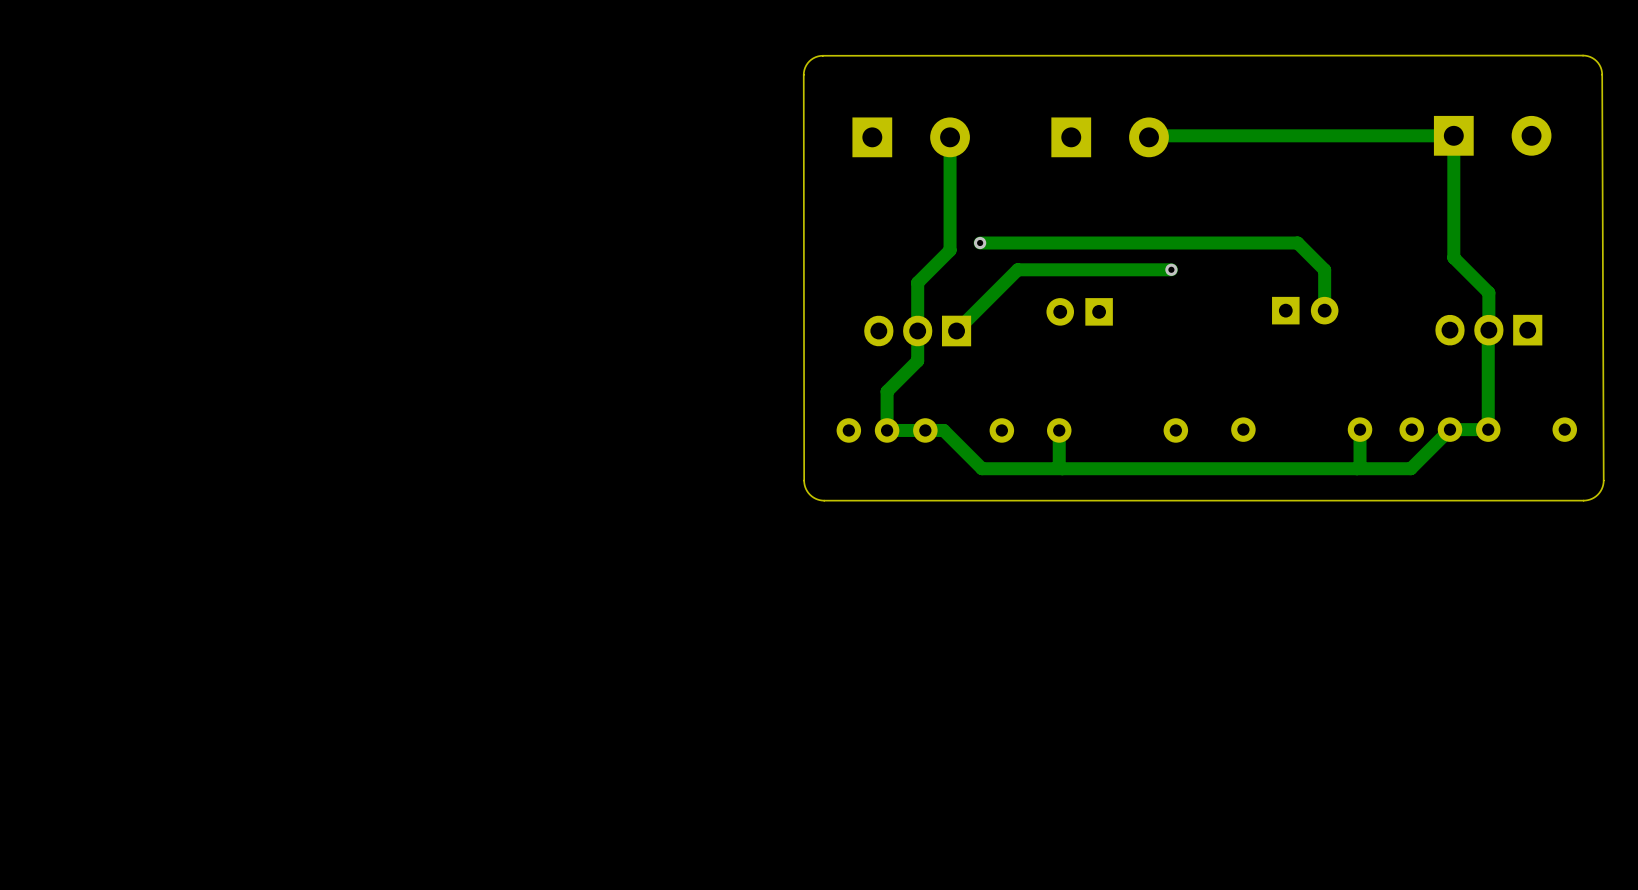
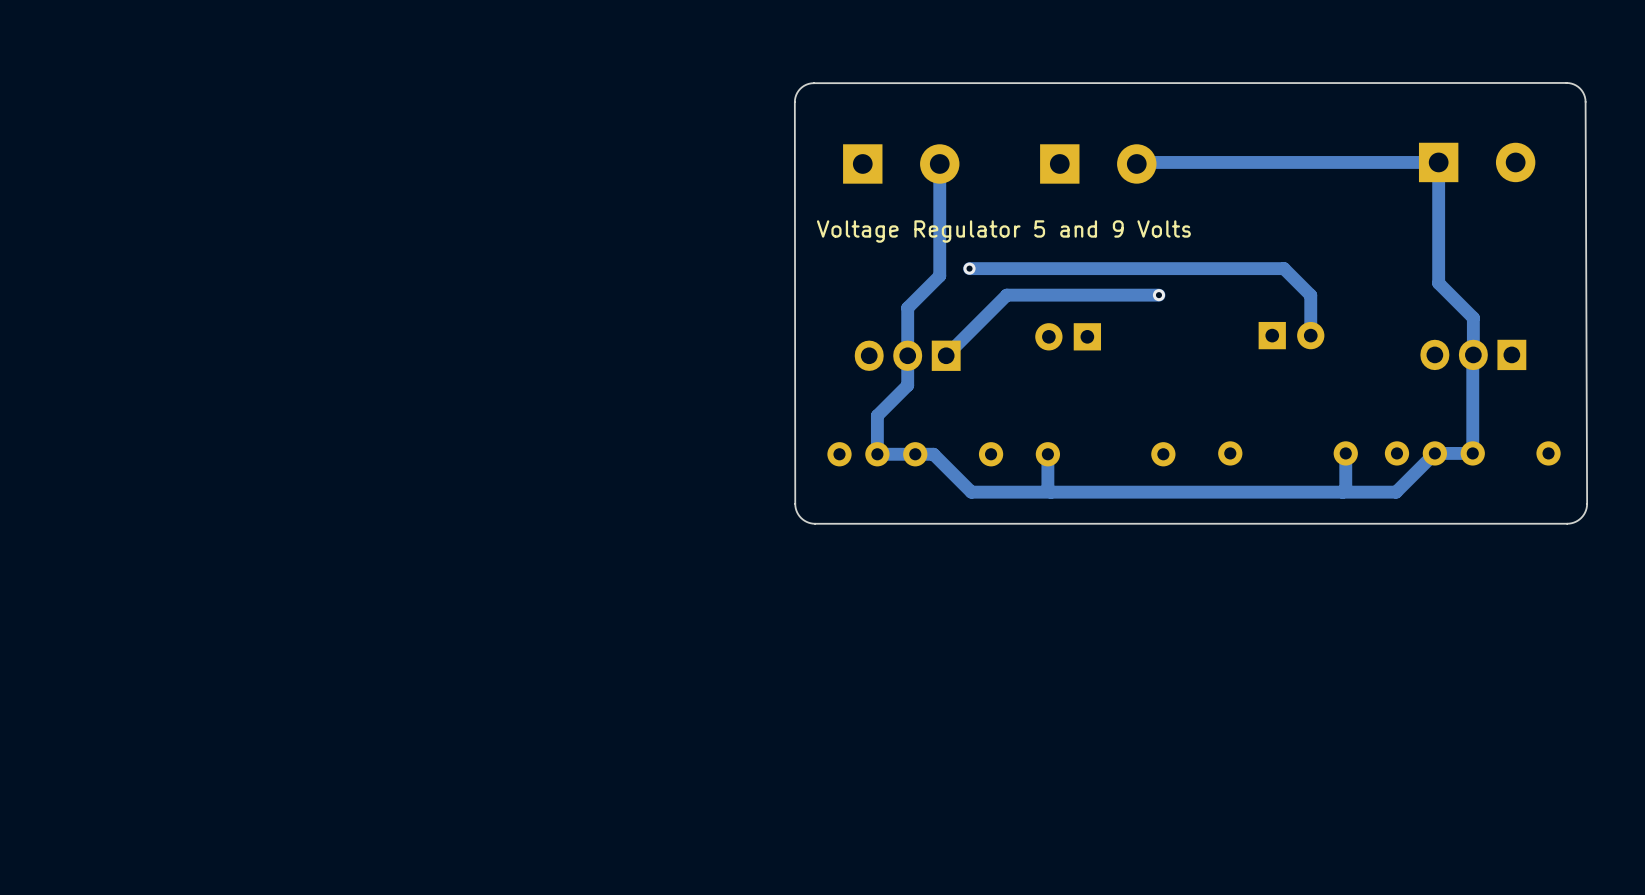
text: none -> Voltage Regulator 5 and 9 Volts (1003, 231)

